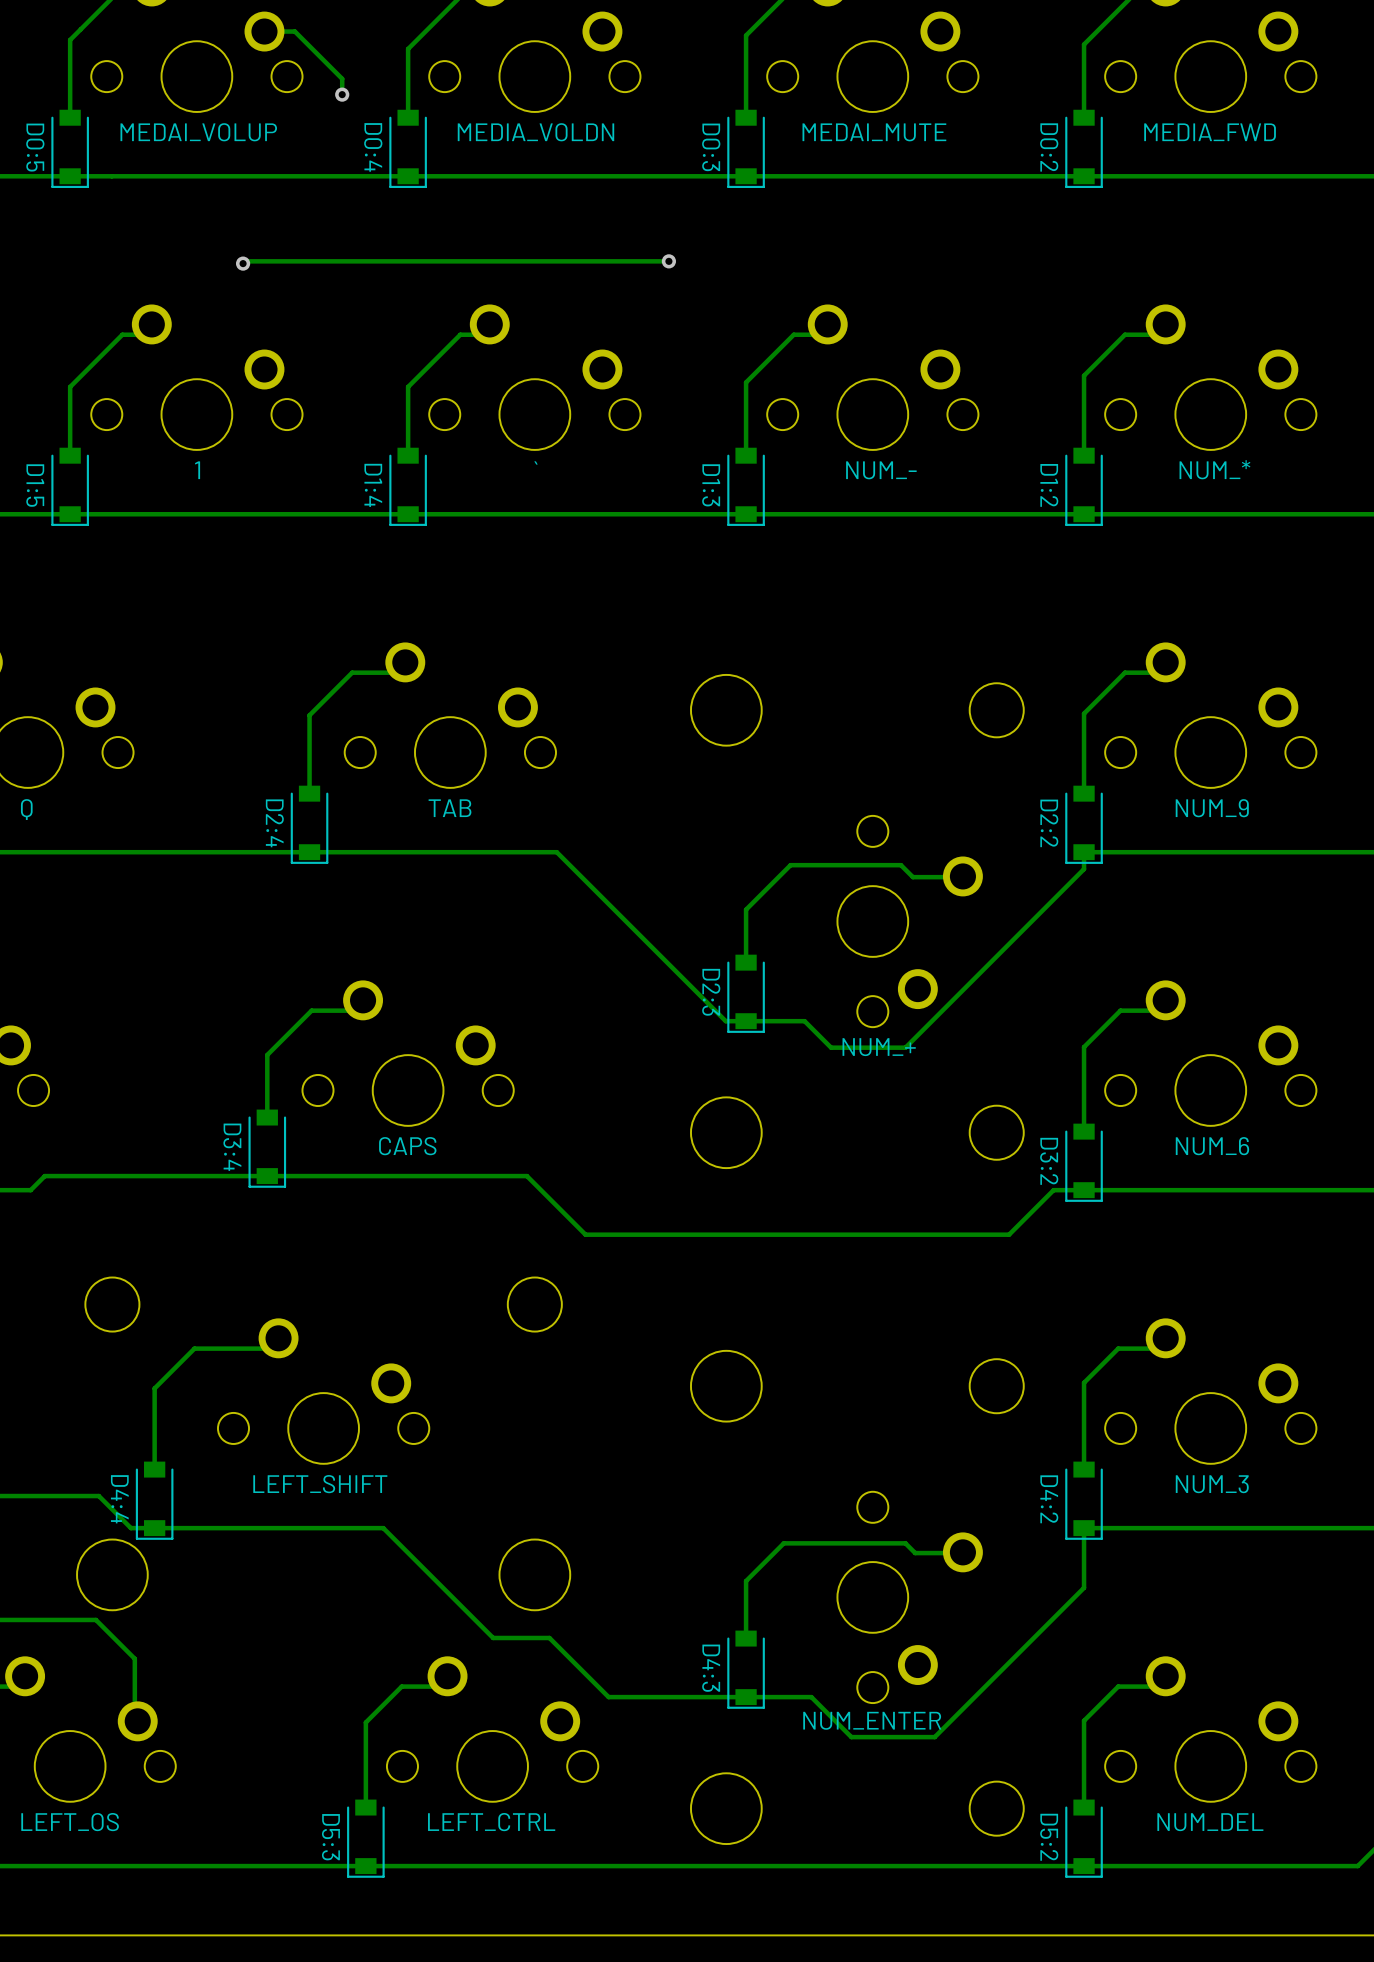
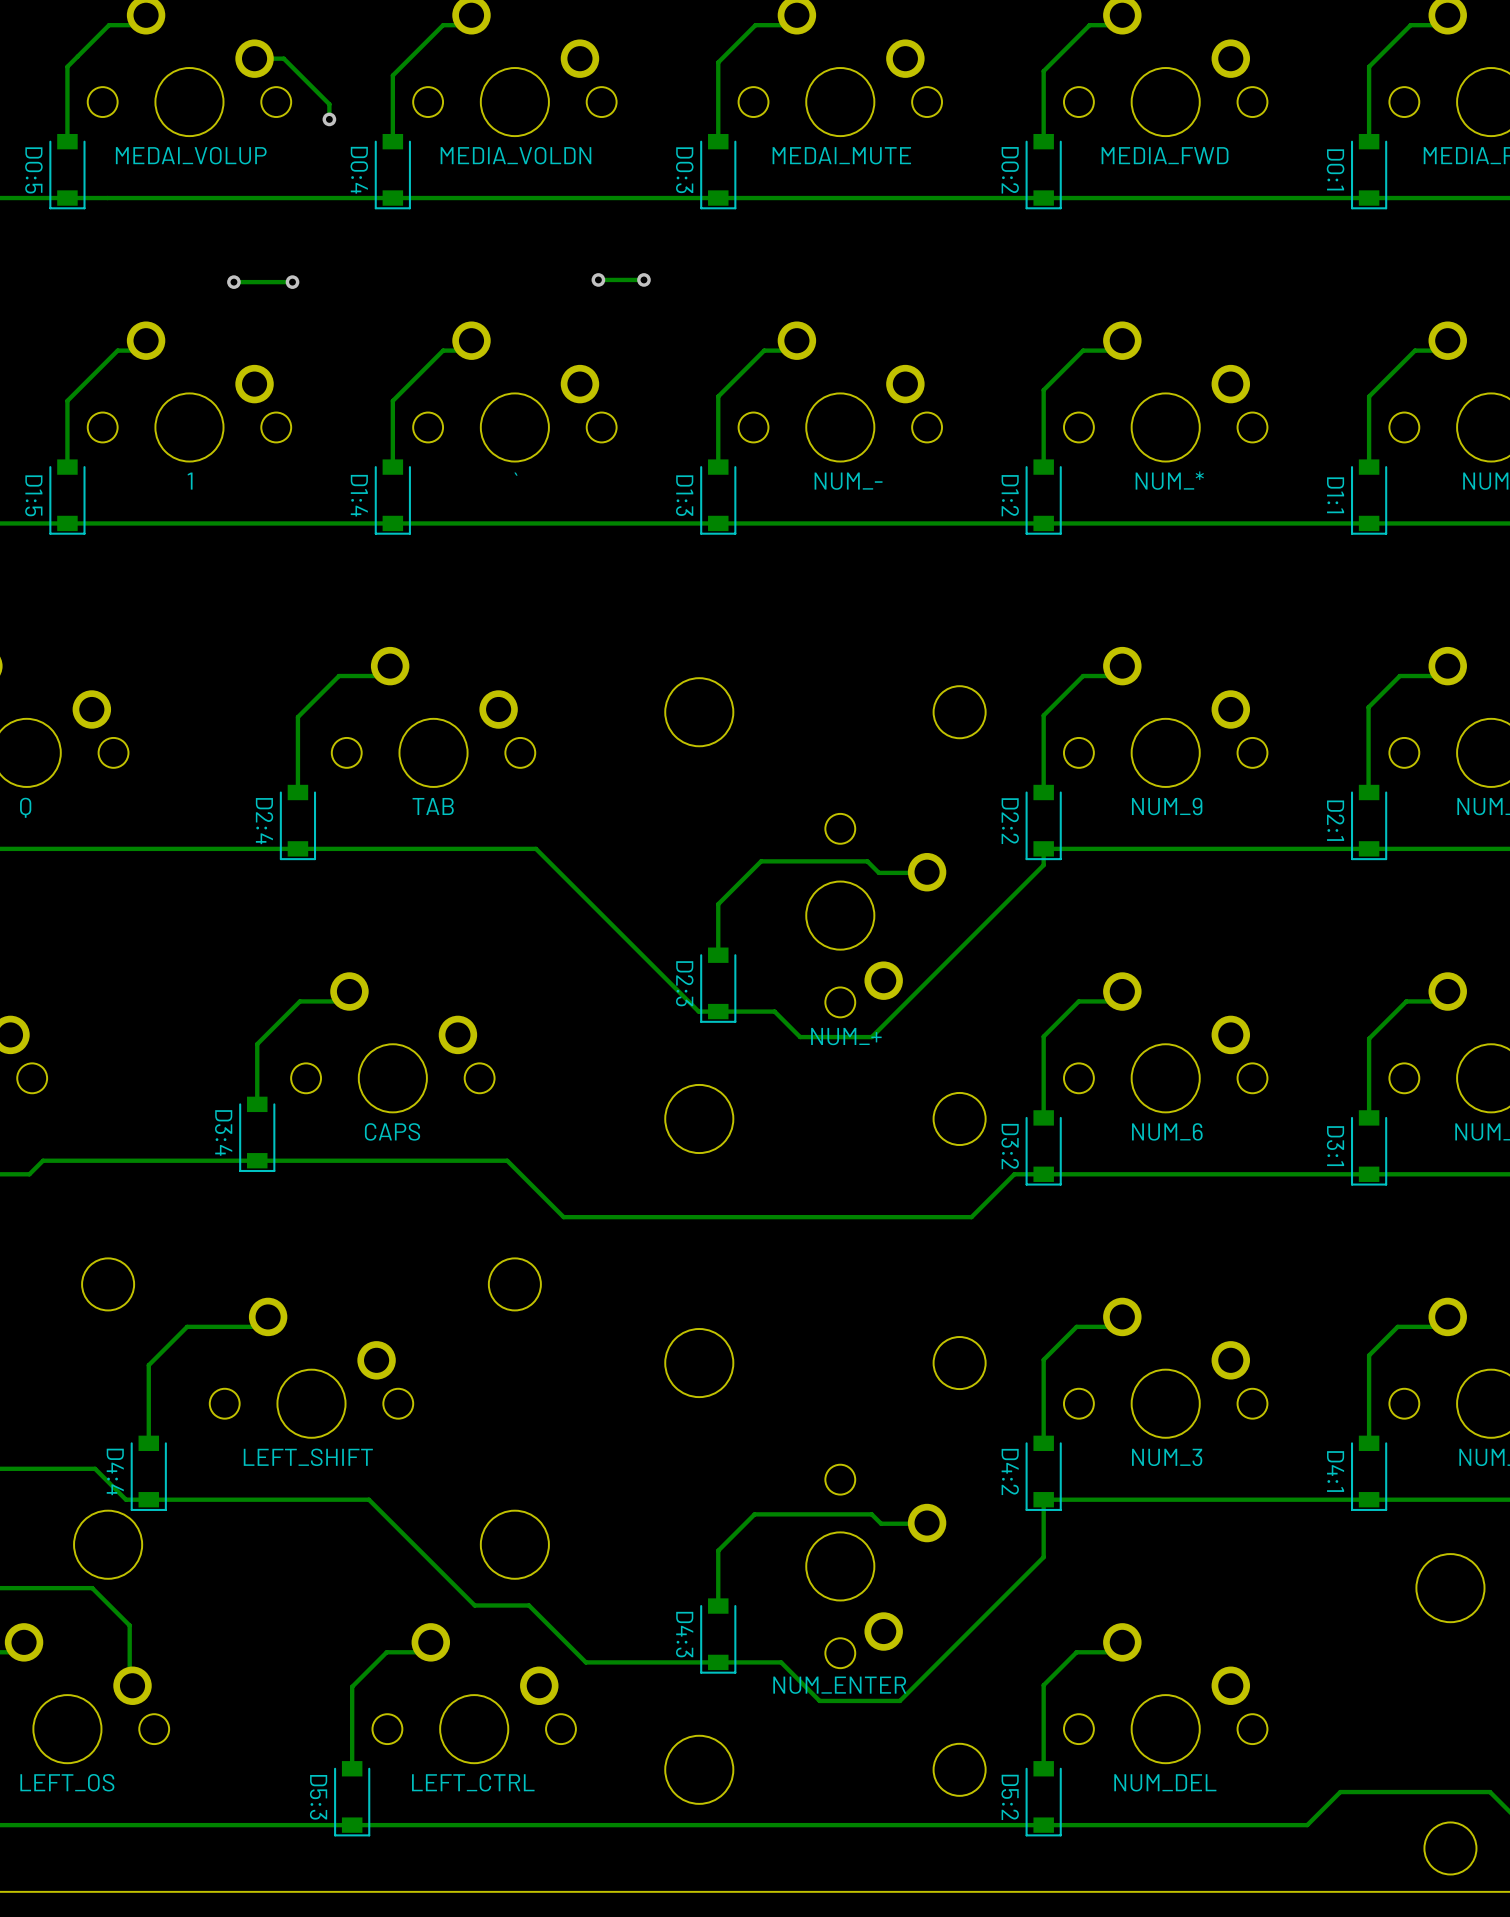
track: (621, 261) (245, 261) (243, 263) -> (292, 282) (233, 282)
via: none -> (598, 279)
via: none -> (292, 282)

